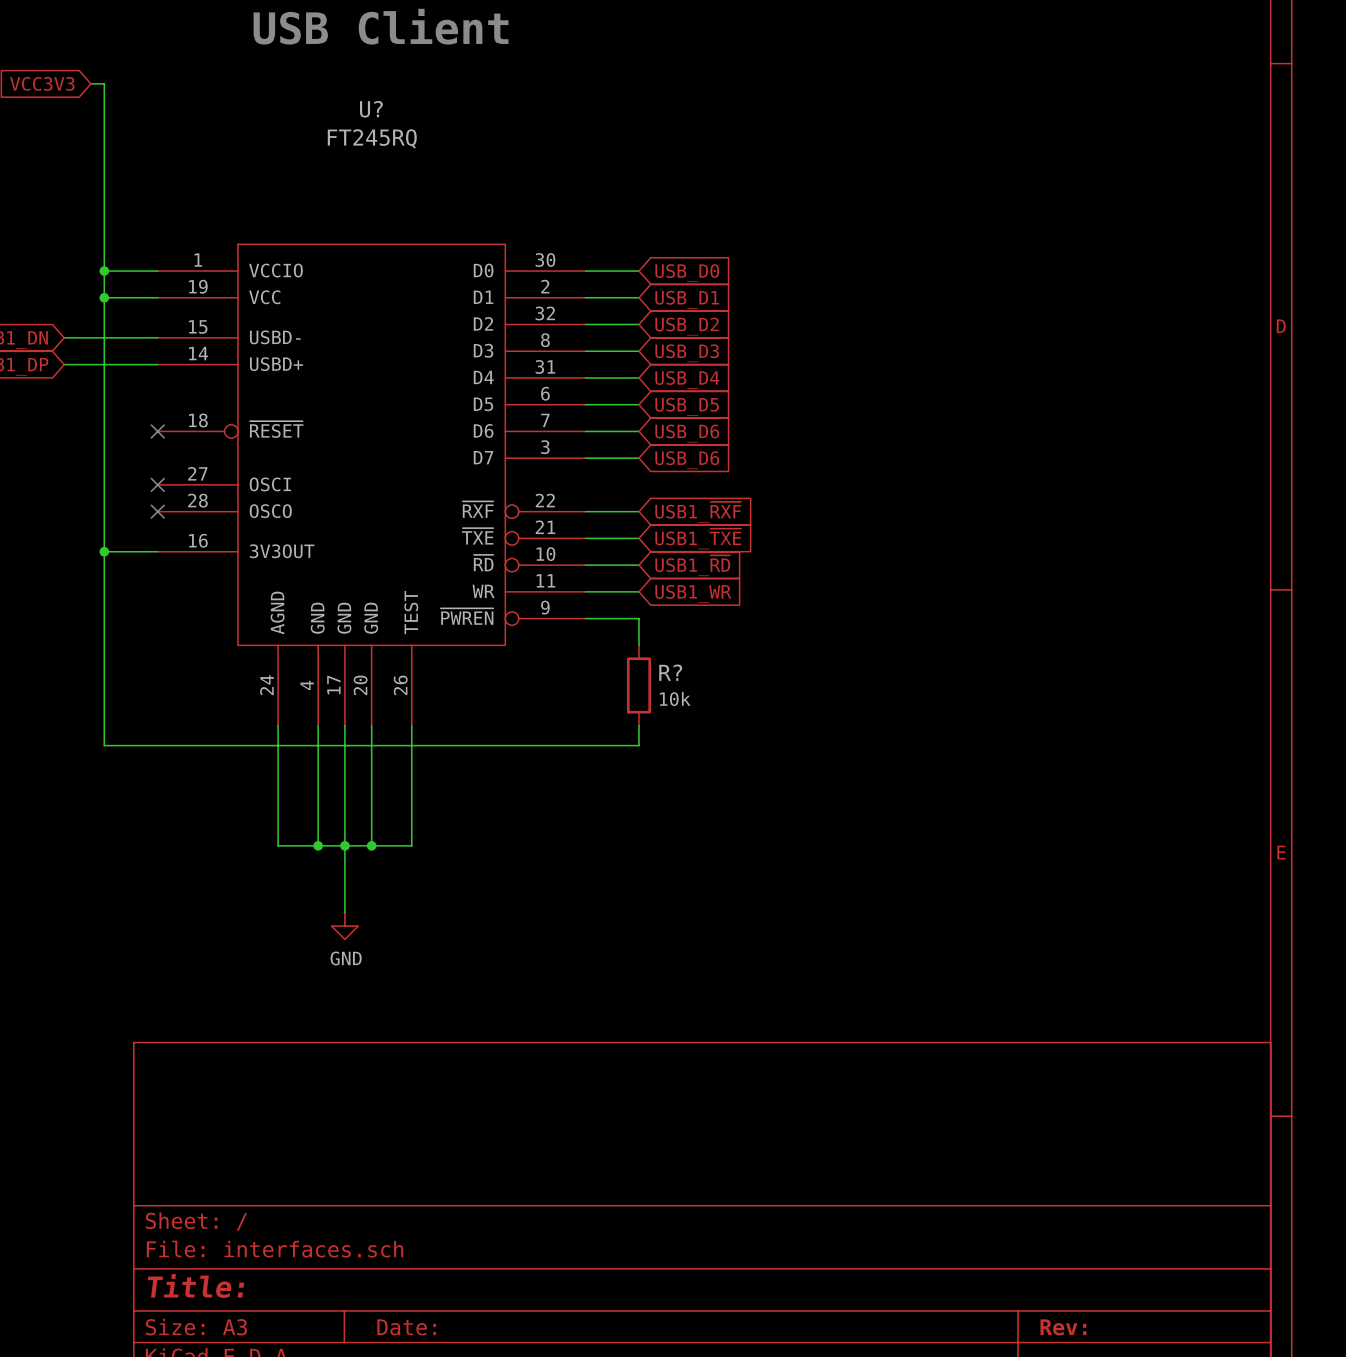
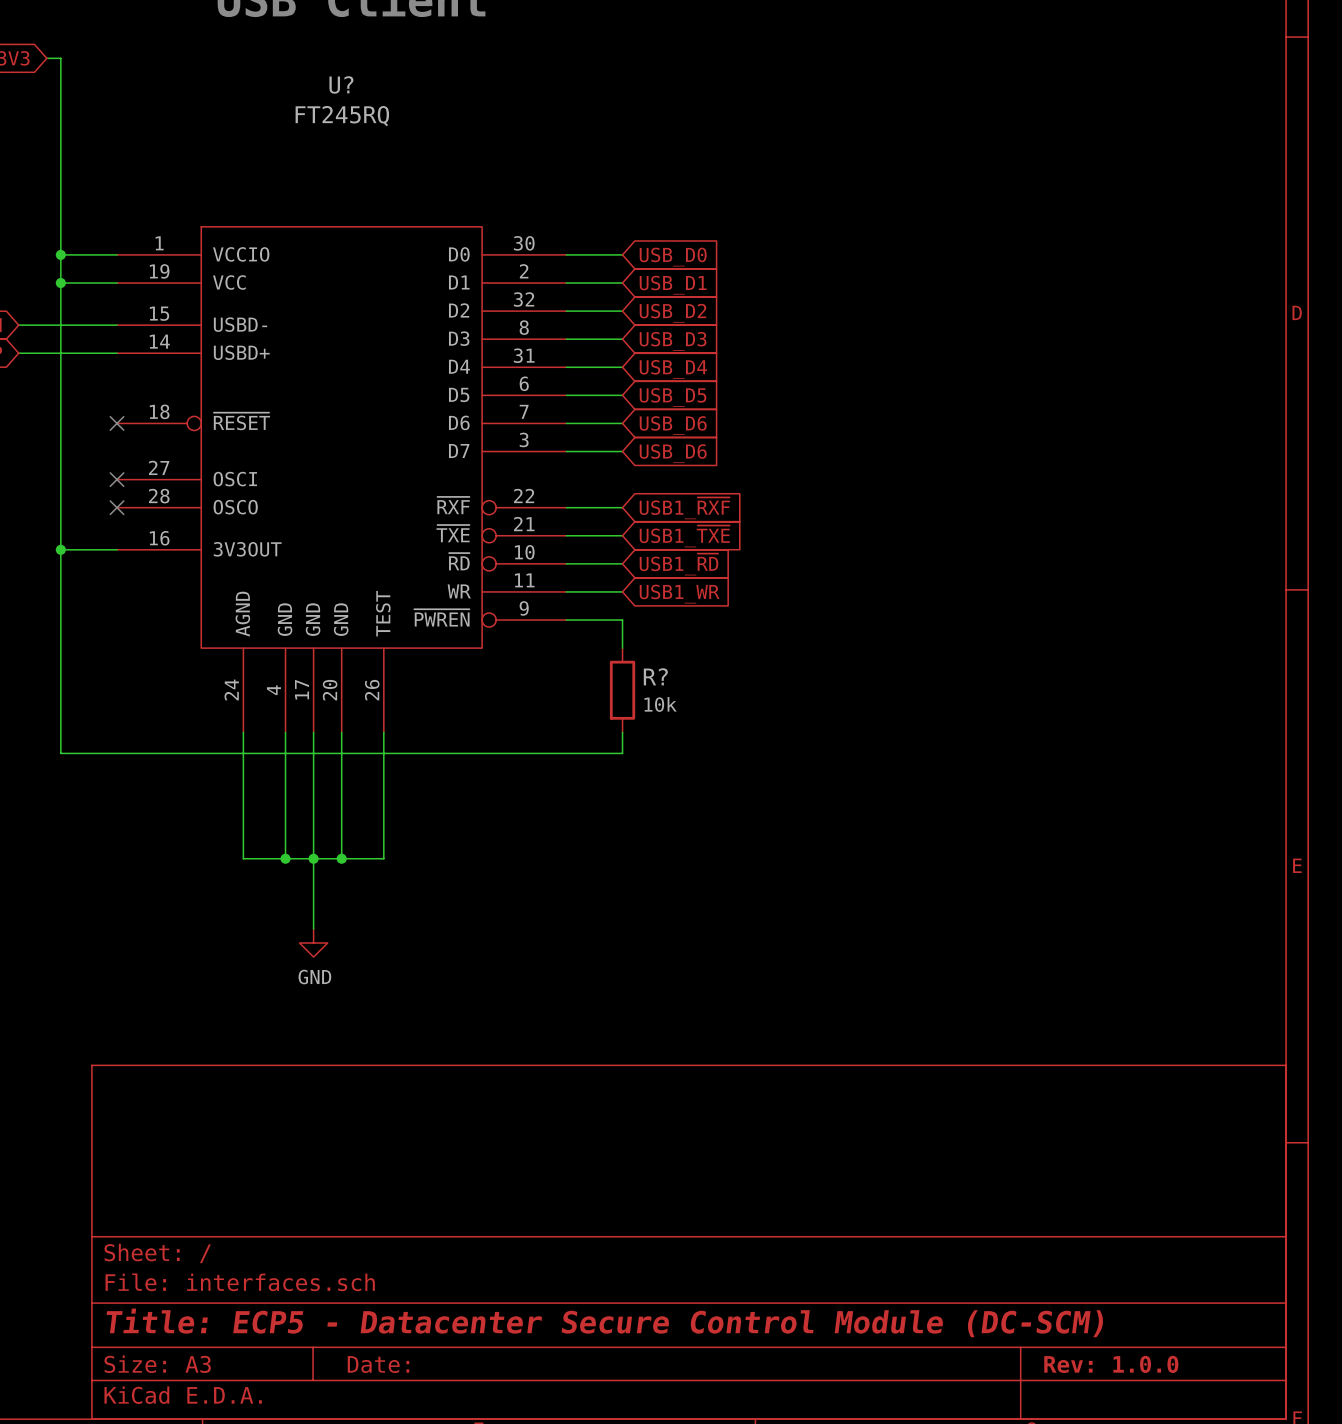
title block: Title: (196, 1286) -> Title: ECP5 - Datacenter Secure Control Module (DC-SCM) (604, 1322)
title block: Rev: (1063, 1327) -> Rev: 1.0.0 (1111, 1364)

